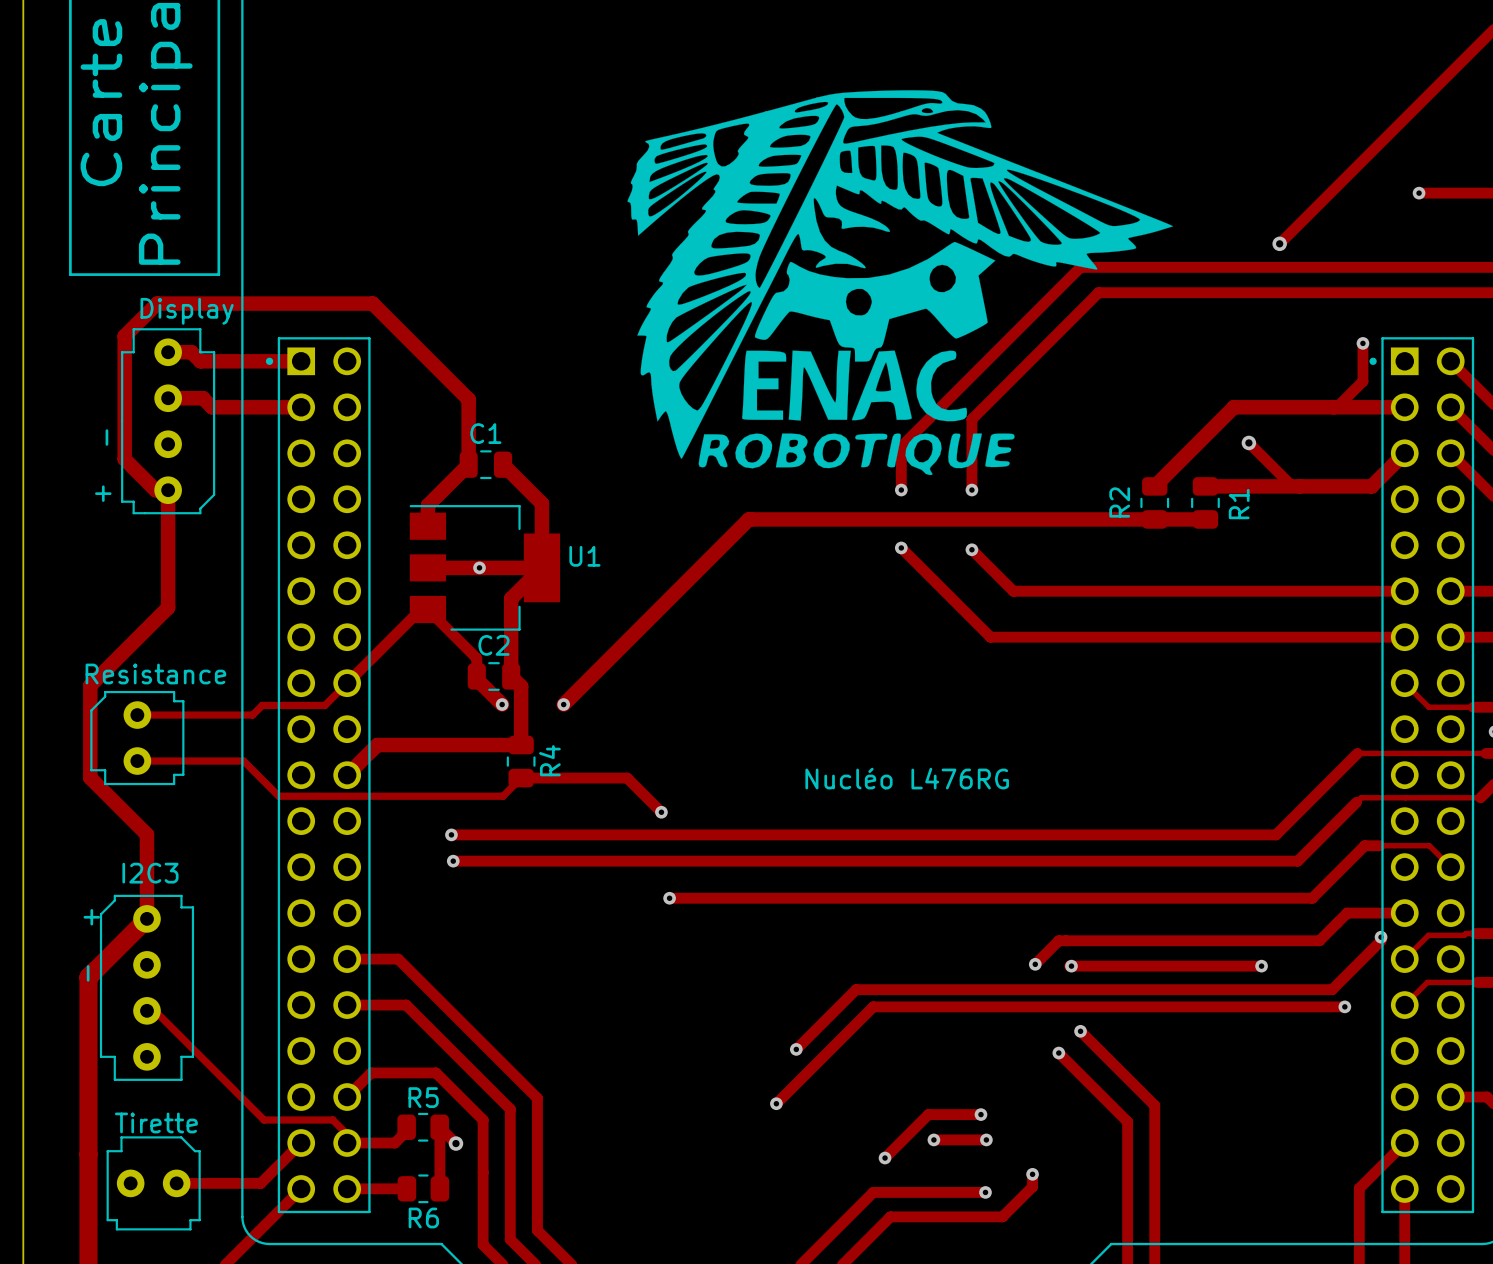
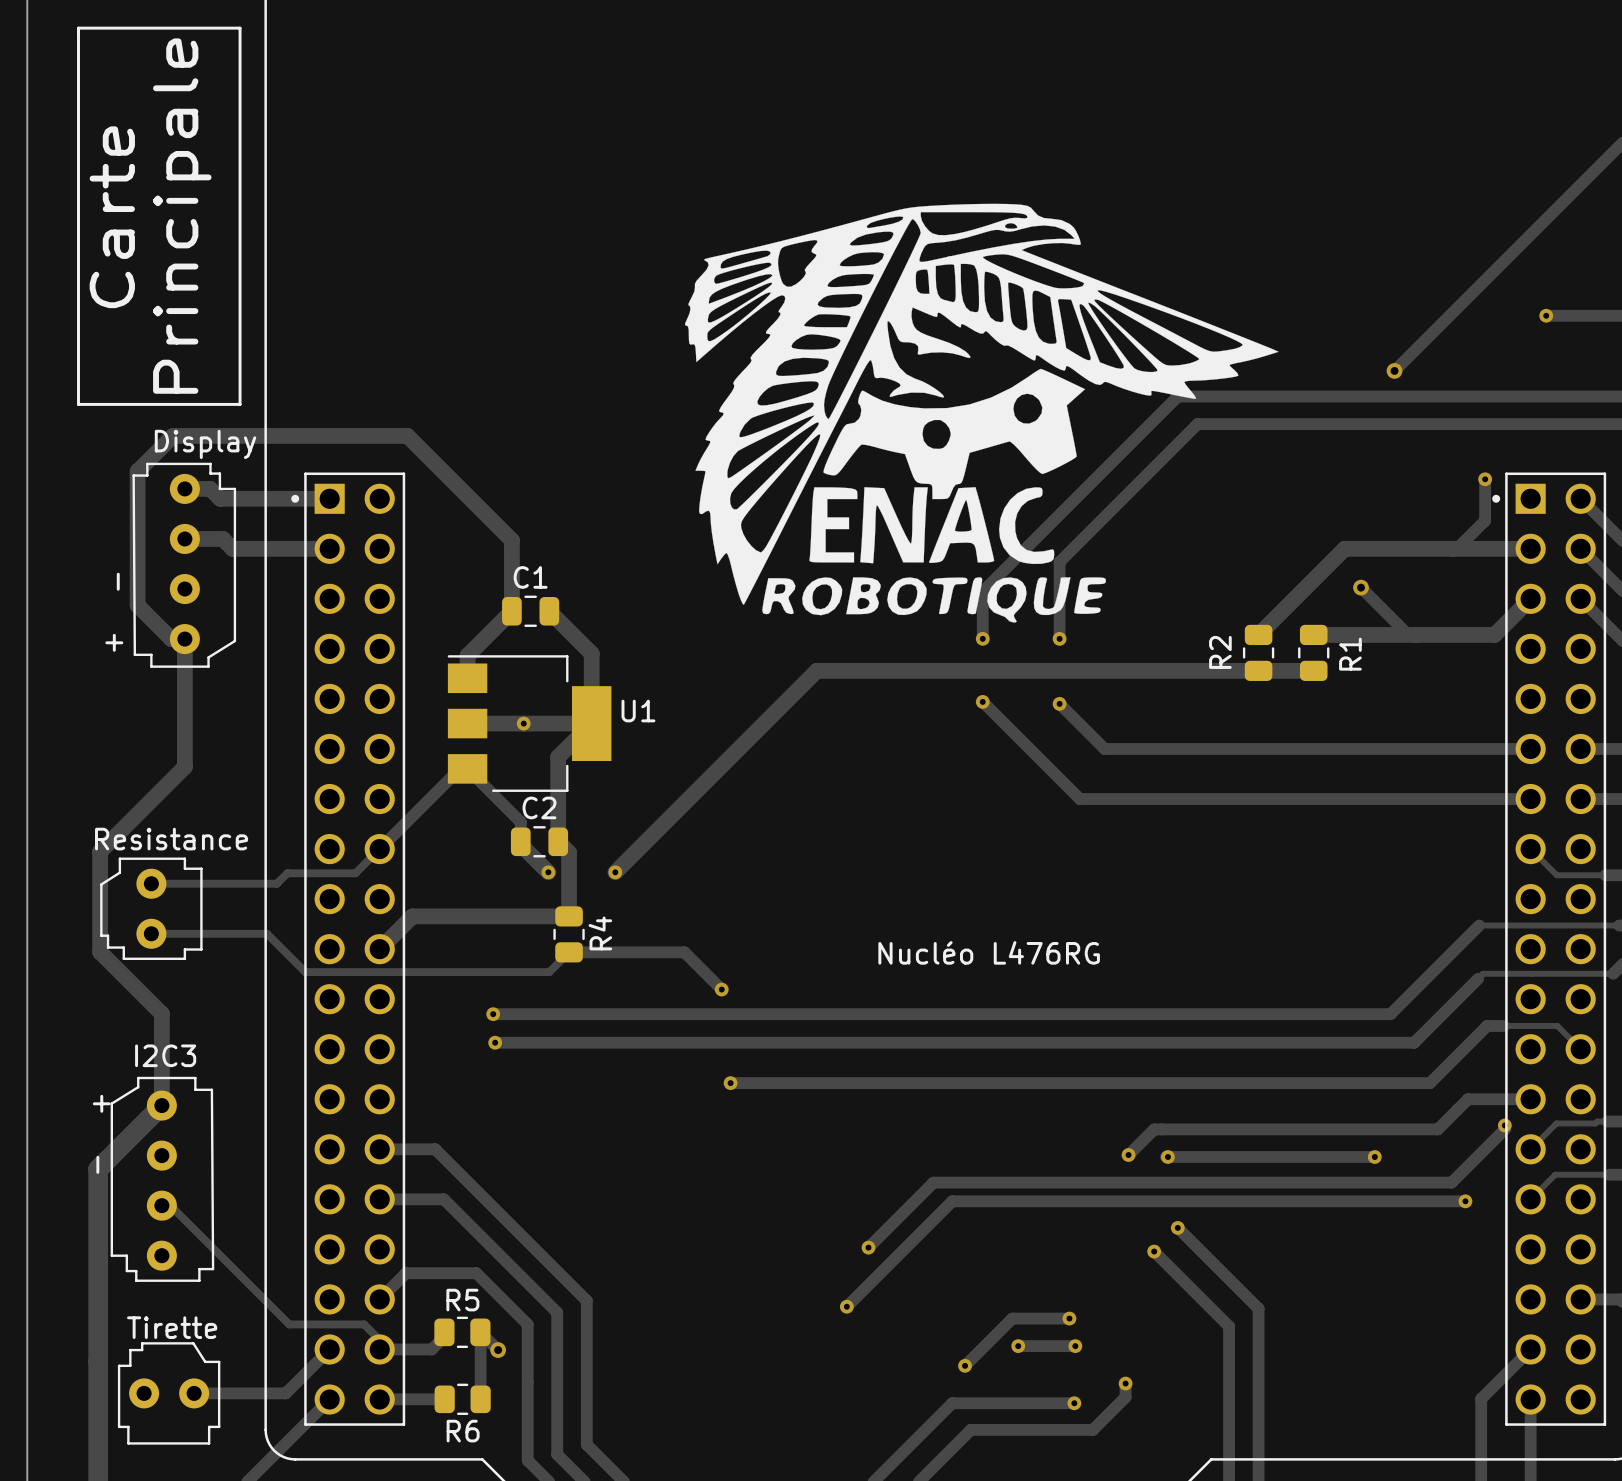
Display footprint: [121, 328, 216, 515] -> [132, 462, 237, 668]
Resistance footprint: [90, 690, 185, 786] -> [100, 857, 203, 960]
I2C3 footprint: [99, 894, 195, 1081] -> [110, 1076, 215, 1282]
Tirette footprint: [106, 1136, 201, 1231] -> [117, 1342, 221, 1445]

